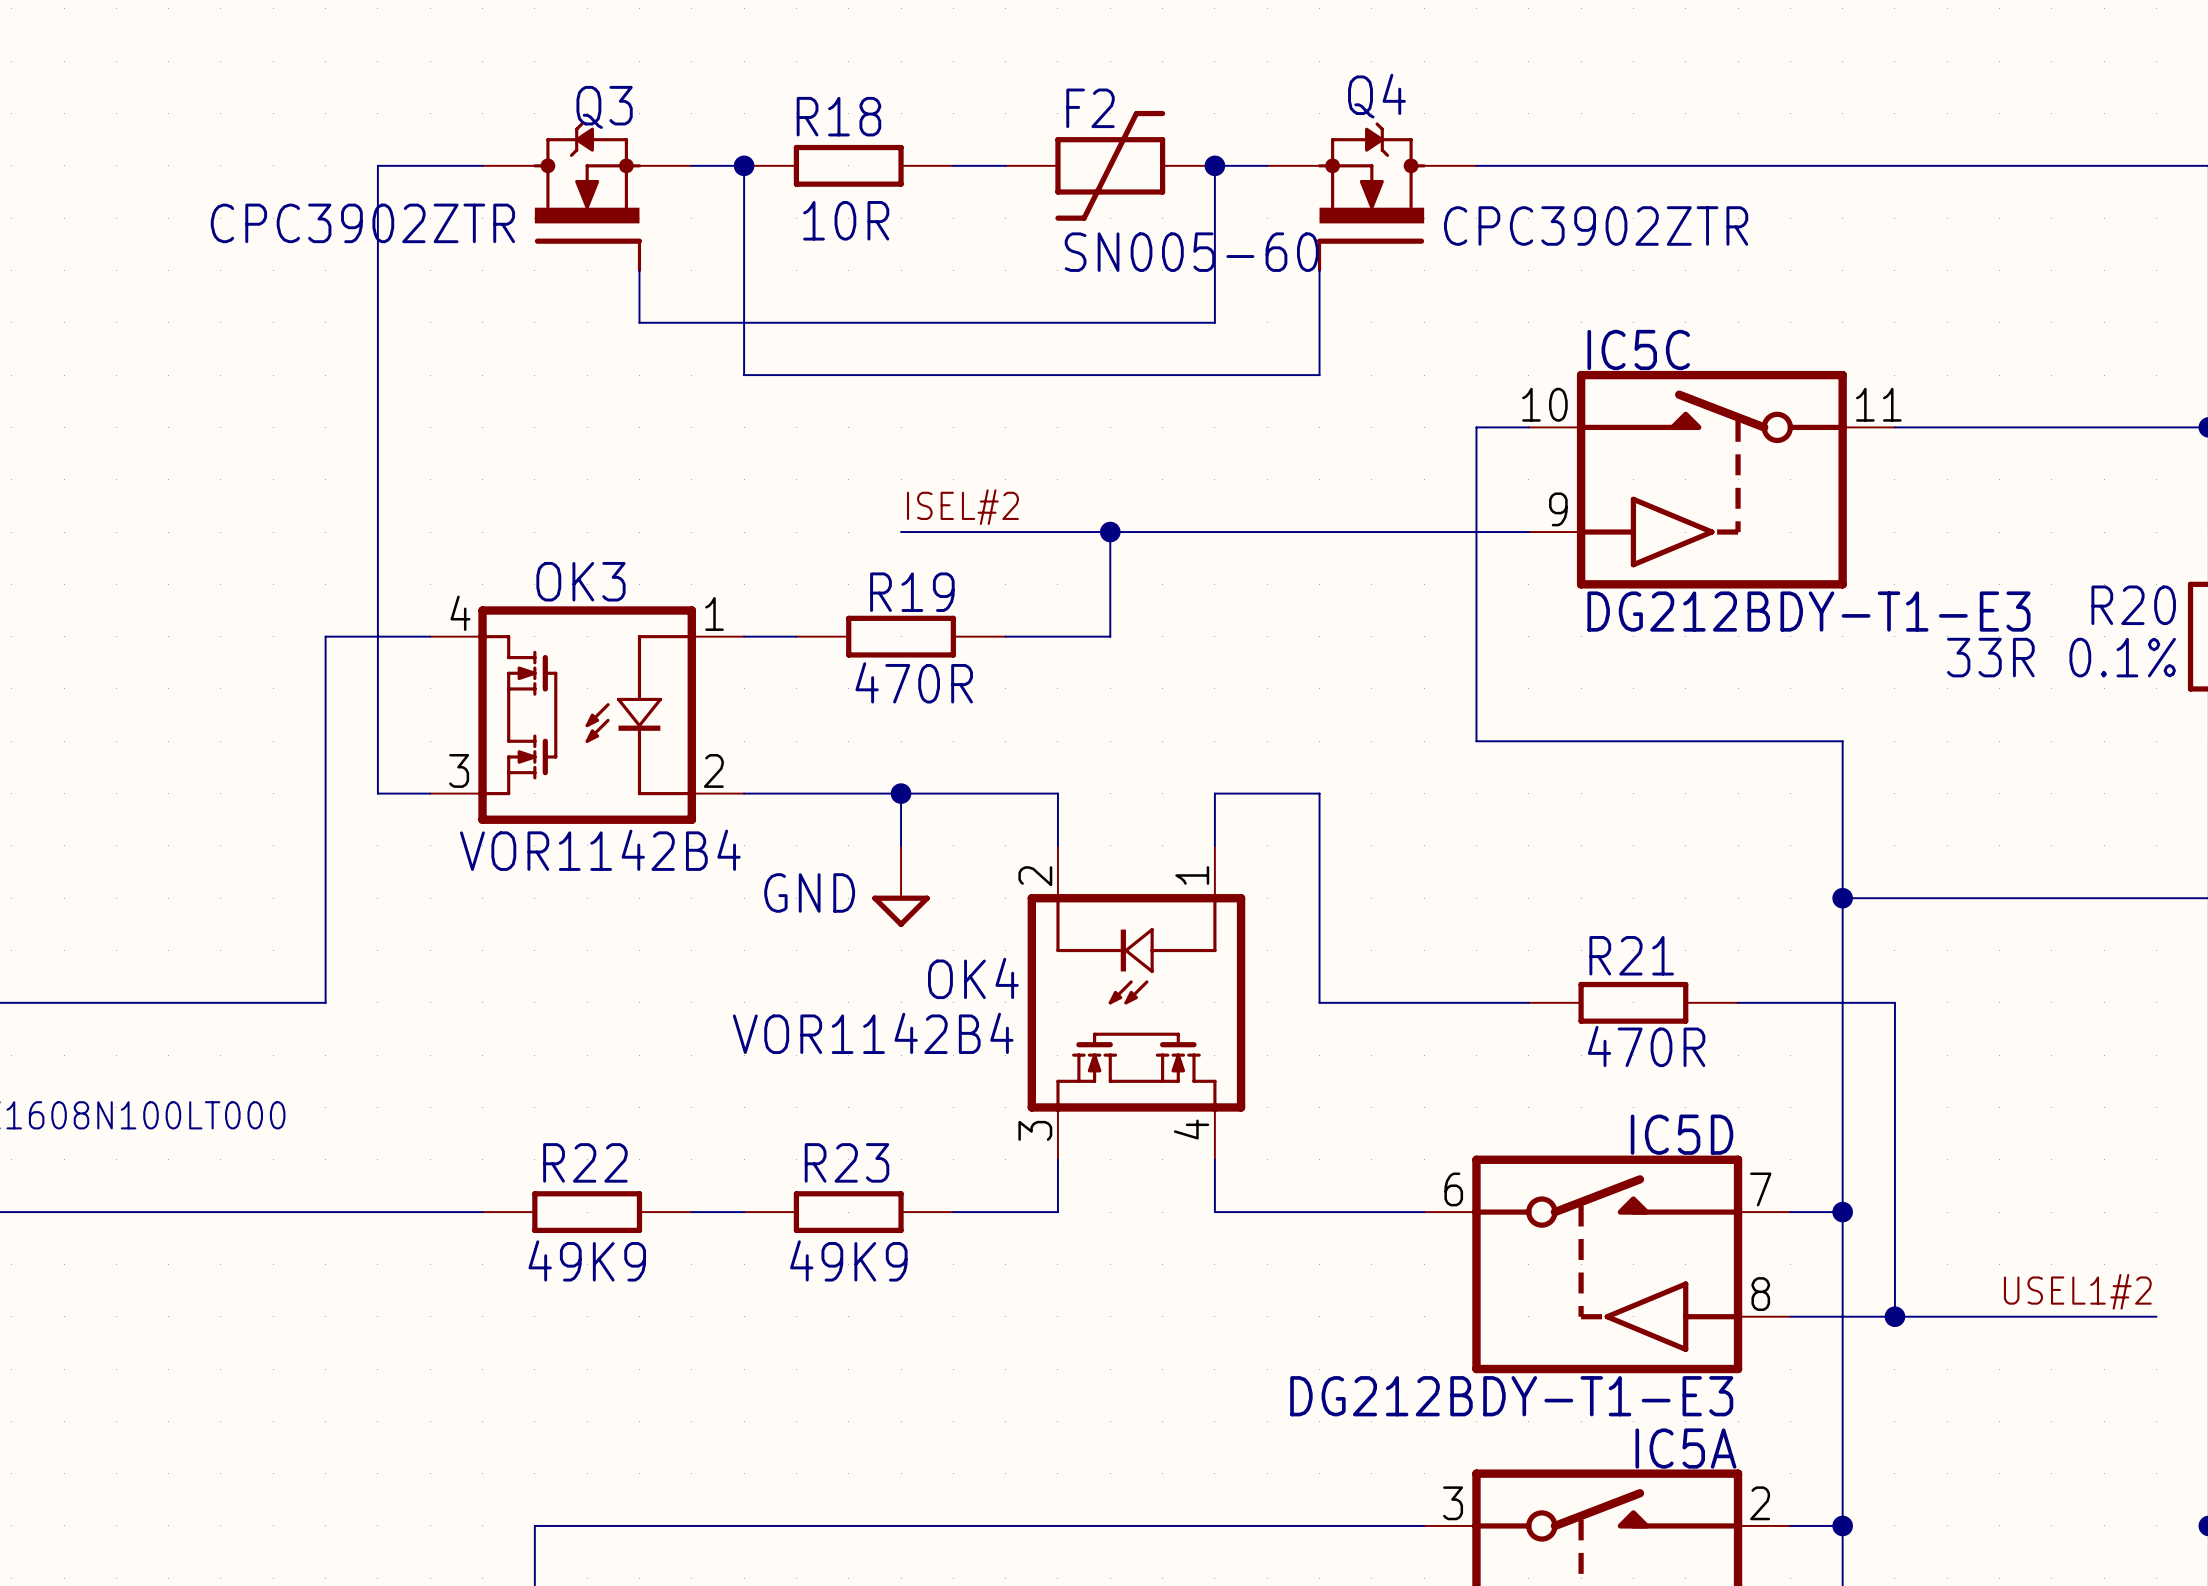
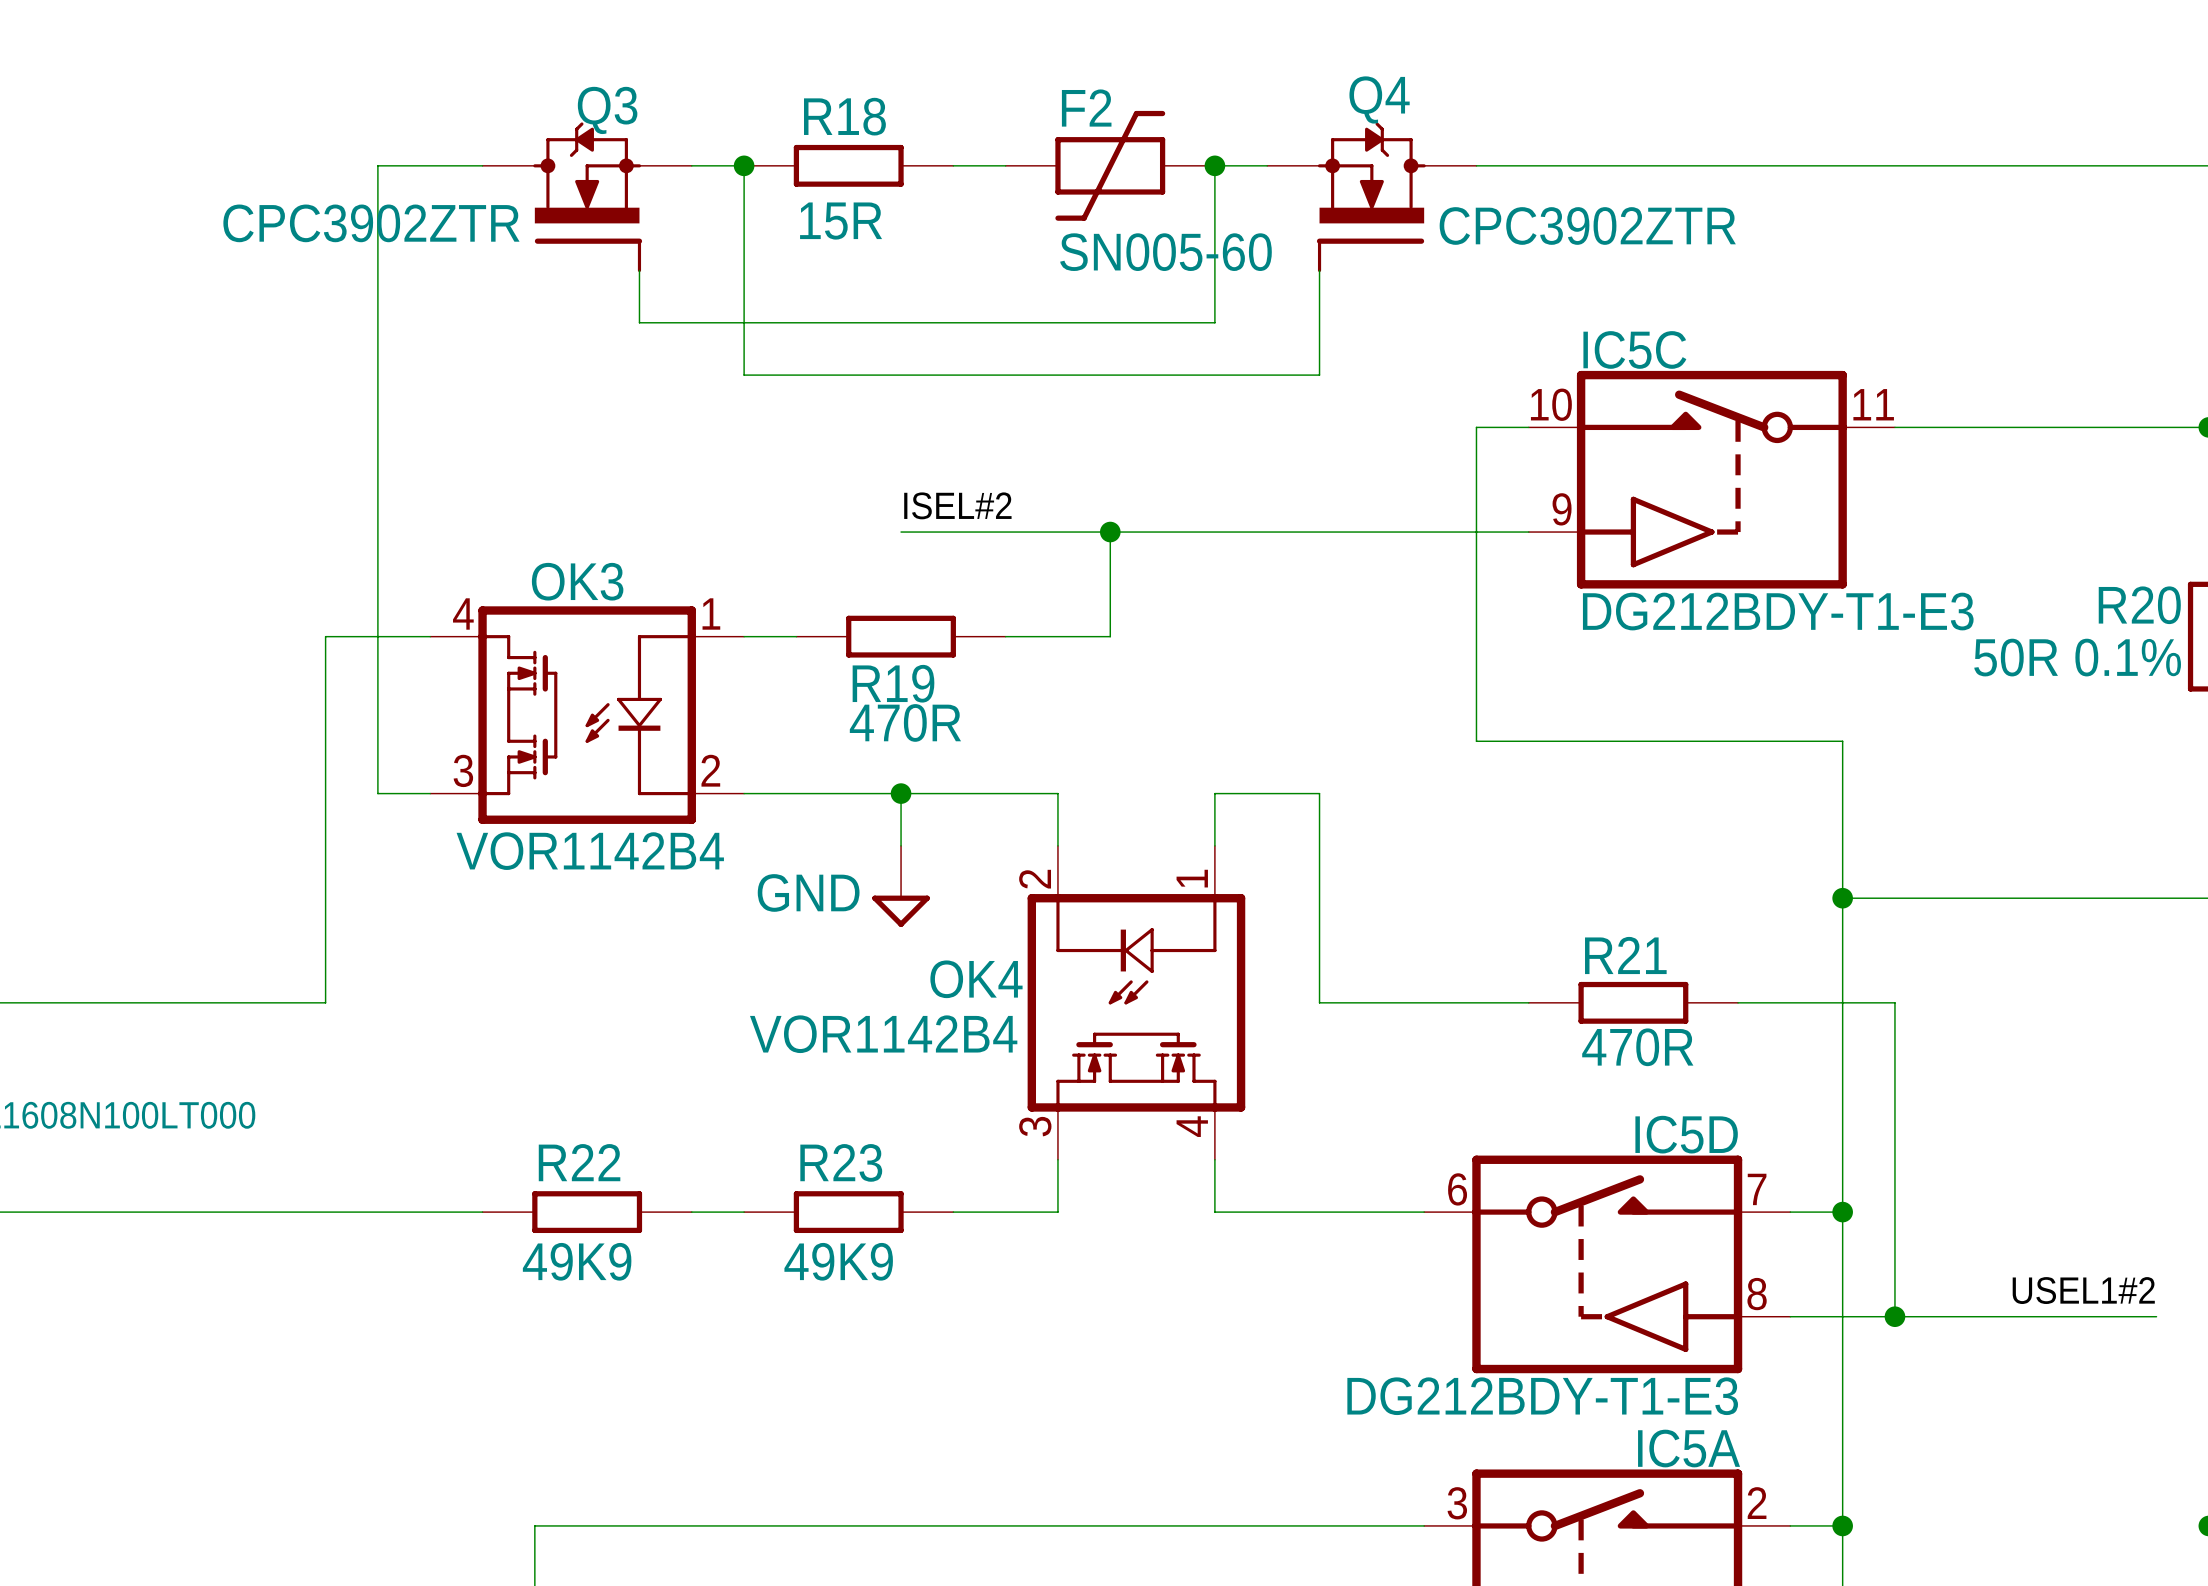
R18 value: 10R (846, 220) -> 15R (841, 221)
R19 name position: R19 (912, 592) -> R19 (893, 683)
R20 value: 33R 0.1% (2061, 657) -> 50R 0.1% (2077, 657)
R19 value position: 470R (914, 682) -> 470R (905, 722)

